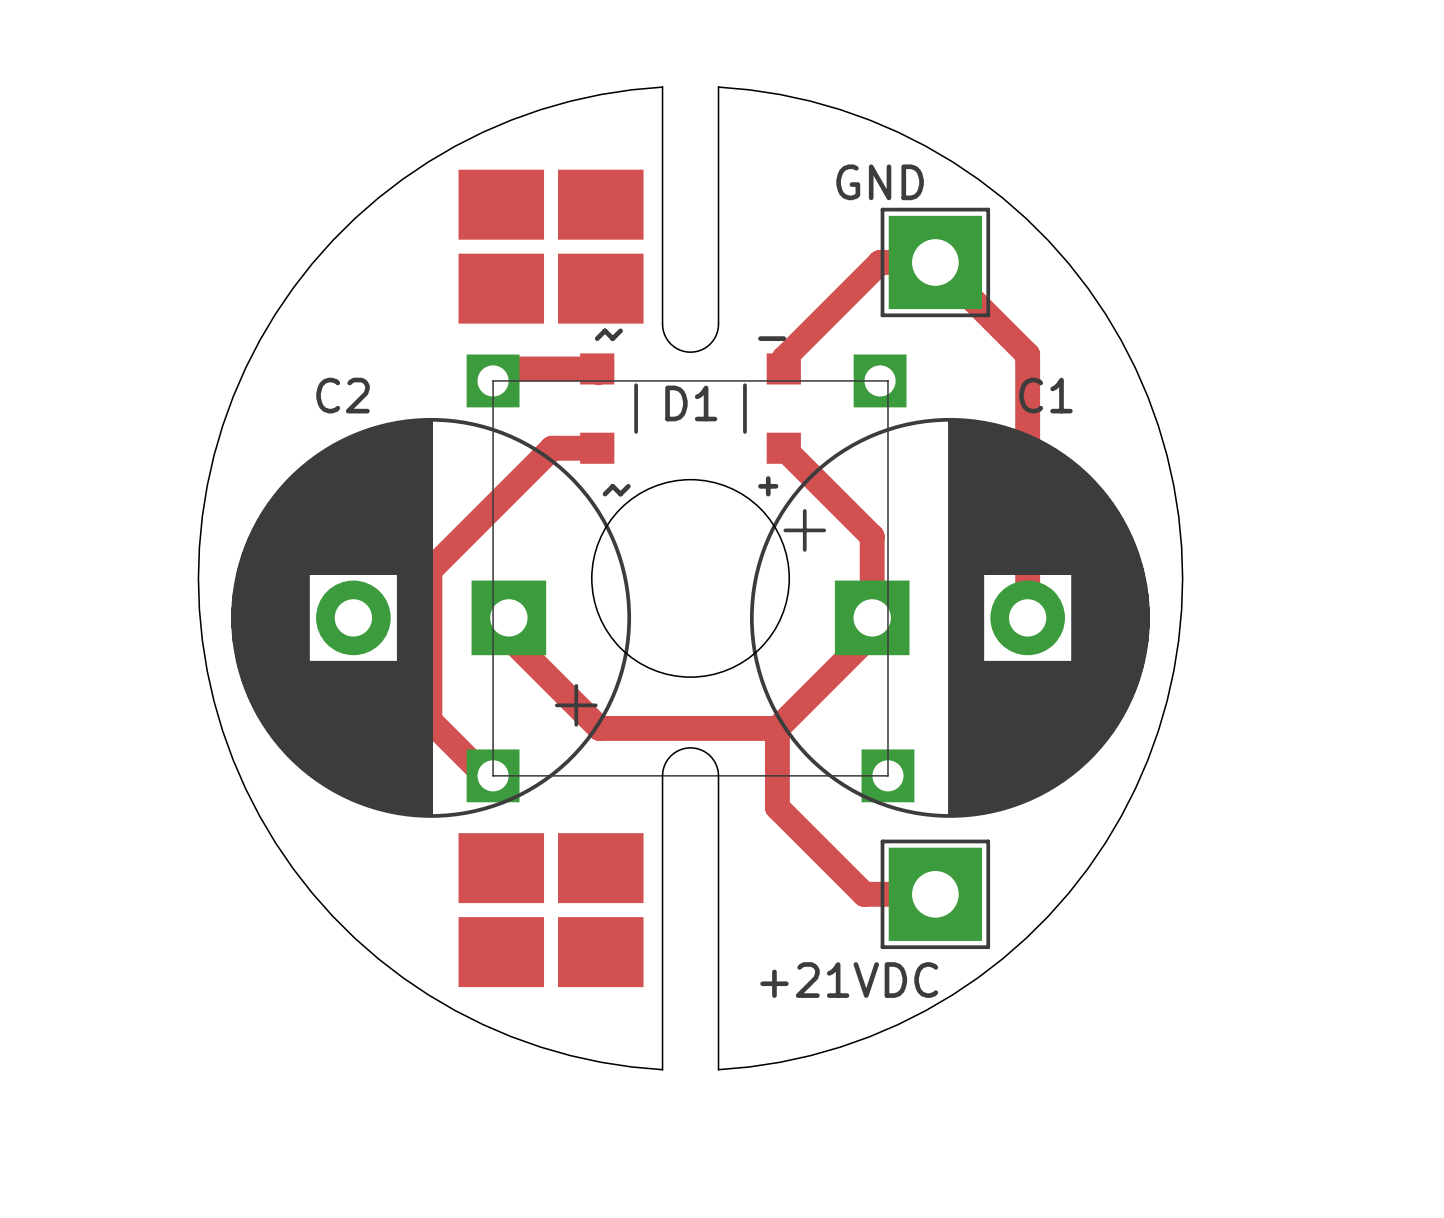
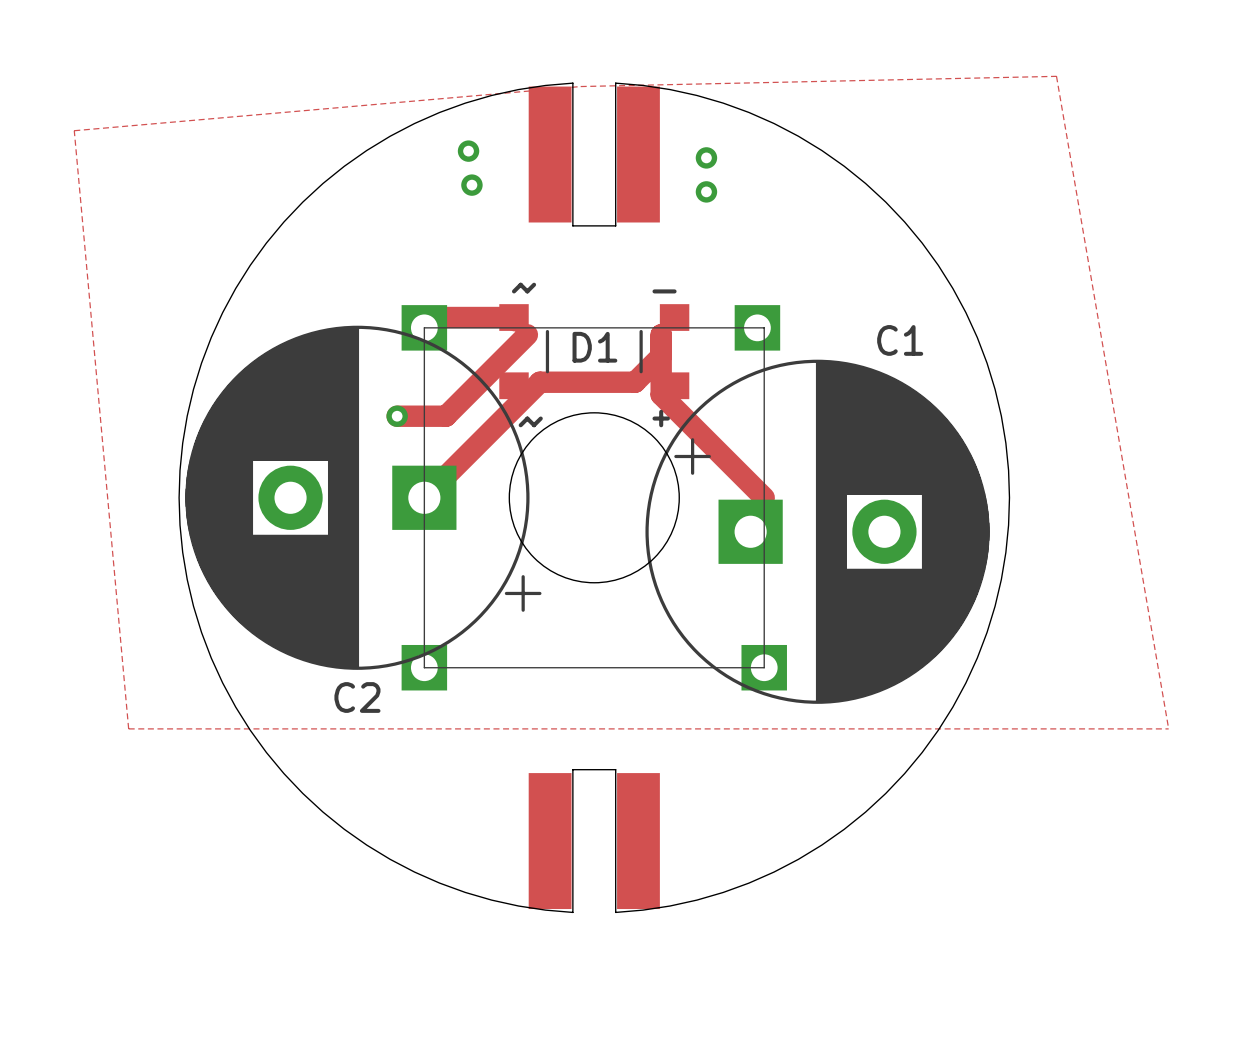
board edge: (662, 87) (662, 324) (664, 334) (670, 343) (683, 351) (697, 351) (712, 341) (718, 327) (718, 87) (780, 94) (810, 101) (869, 120) (925, 146) (978, 179) (1002, 198) (1048, 240) (1087, 288) (1121, 340) (1147, 396) (1167, 455) (1173, 485) (1181, 547) (1182, 578) (1178, 640) (1167, 701) (1147, 760) (1121, 816) (1105, 843) (1087, 868) (1048, 916) (1026, 938) (978, 977) (952, 994) (898, 1024) (869, 1036) (810, 1055) (749, 1066) (718, 1069) (718, 775) (716, 765) (710, 756) (697, 748) (683, 748) (668, 758) (662, 772) (662, 1069) (600, 1062) (540, 1047) (511, 1036) (455, 1010) (402, 977) (354, 938) (332, 916) (293, 868) (275, 843) (245, 788) (222, 731) (207, 670) (199, 609) (198, 578) (202, 516) (214, 455) (233, 396) (259, 340) (275, 313) (293, 288) (332, 240) (354, 218) (402, 179) (428, 161) (482, 132) (511, 120) (570, 101) (631, 89) (662, 87) -> (572, 83) (545, 85) (491, 95) (465, 103) (414, 123) (390, 136) (344, 166) (322, 183) (283, 221) (250, 265) (235, 288) (211, 337) (201, 363) (193, 389) (182, 443) (179, 497) (180, 525) (182, 552) (193, 606) (201, 632) (222, 682) (250, 730) (266, 752) (302, 793) (322, 812) (344, 829) (390, 859) (439, 883) (491, 900) (518, 906) (572, 912) (572, 769) (615, 769) (615, 912) (643, 910) (696, 900) (723, 892) (774, 872) (798, 859) (844, 829) (885, 793) (904, 773) (938, 730) (952, 707) (977, 658) (987, 632) (995, 606) (1005, 552) (1009, 497) (1008, 470) (1001, 416) (995, 389) (987, 363) (965, 312) (938, 265) (922, 243) (904, 221) (865, 183) (844, 166) (798, 136) (749, 112) (696, 95) (670, 89) (615, 83) (615, 225) (572, 225) (572, 83)
zone outline: none -> (1056, 76) (1168, 728) (128, 728) (74, 130) (580, 86) (1056, 76)
via: none -> (468, 151)
part: none -> (550, 154)
part: none -> (638, 154)
via: none -> (706, 157)
via: none -> (471, 185)
via: none -> (706, 191)
part: (551, 246) -> none
GND: (935, 262) -> none
track: (783, 368) (783, 358) (880, 262) (935, 262) (1027, 354) (1027, 617) -> none
track: none -> (527, 334) (445, 416) (397, 416)
track: none -> (661, 334) (661, 394) (764, 497)
C2 name position: C2 (343, 395) -> C2 (357, 697)
track: none -> (661, 356) (635, 382) (539, 382) (424, 497)
C2 footprint: [231, 417, 632, 818] -> [185, 325, 542, 670]
track: (597, 448) (552, 448) (429, 570) (429, 720) (485, 775) (493, 775) -> none
track: (783, 448) (872, 536) (872, 617) -> none
via: none -> (397, 416)
track: (868, 637) (777, 728) -> none
track: (510, 639) (599, 728) (777, 728) -> none
track: (777, 728) (777, 807) (864, 894) (935, 894) -> none
+21VDC: (935, 894) -> none
part: (551, 910) -> none
part: none -> (550, 841)
part: none -> (638, 841)

